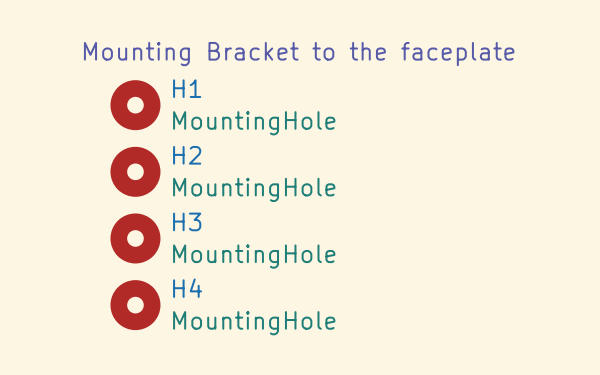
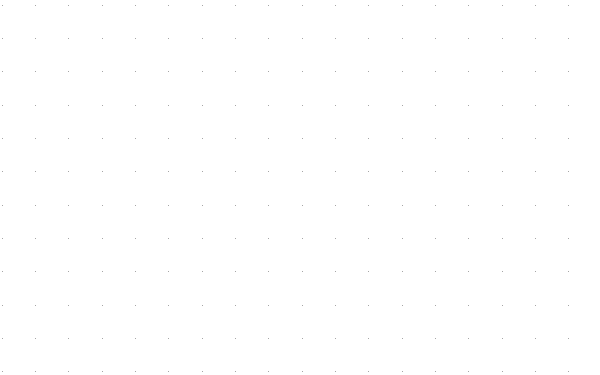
text: Mounting Bracket to the faceplate (299, 54) -> none
H1: MountingHole (135, 105) -> none
H2: MountingHole (135, 171) -> none
H3: MountingHole (135, 238) -> none
H4: MountingHole (135, 305) -> none

